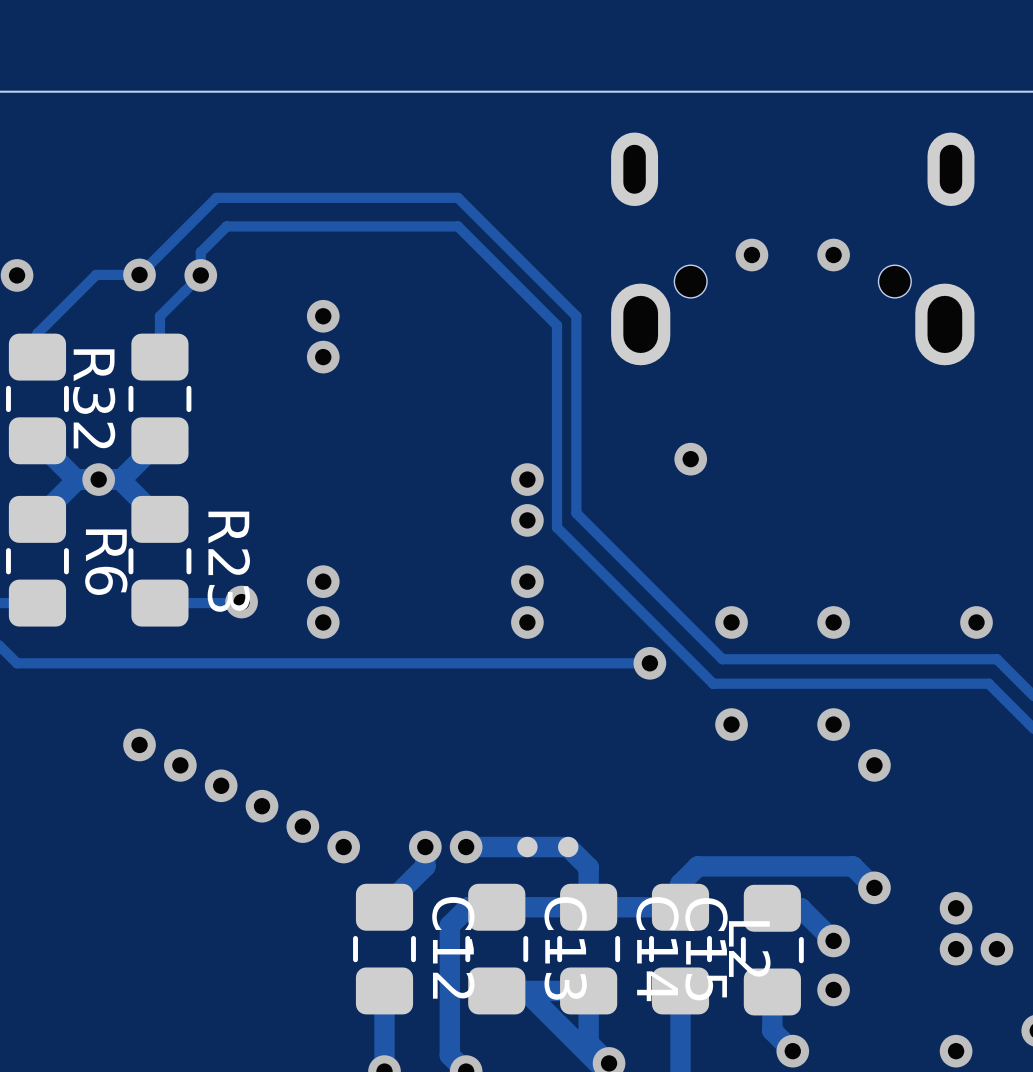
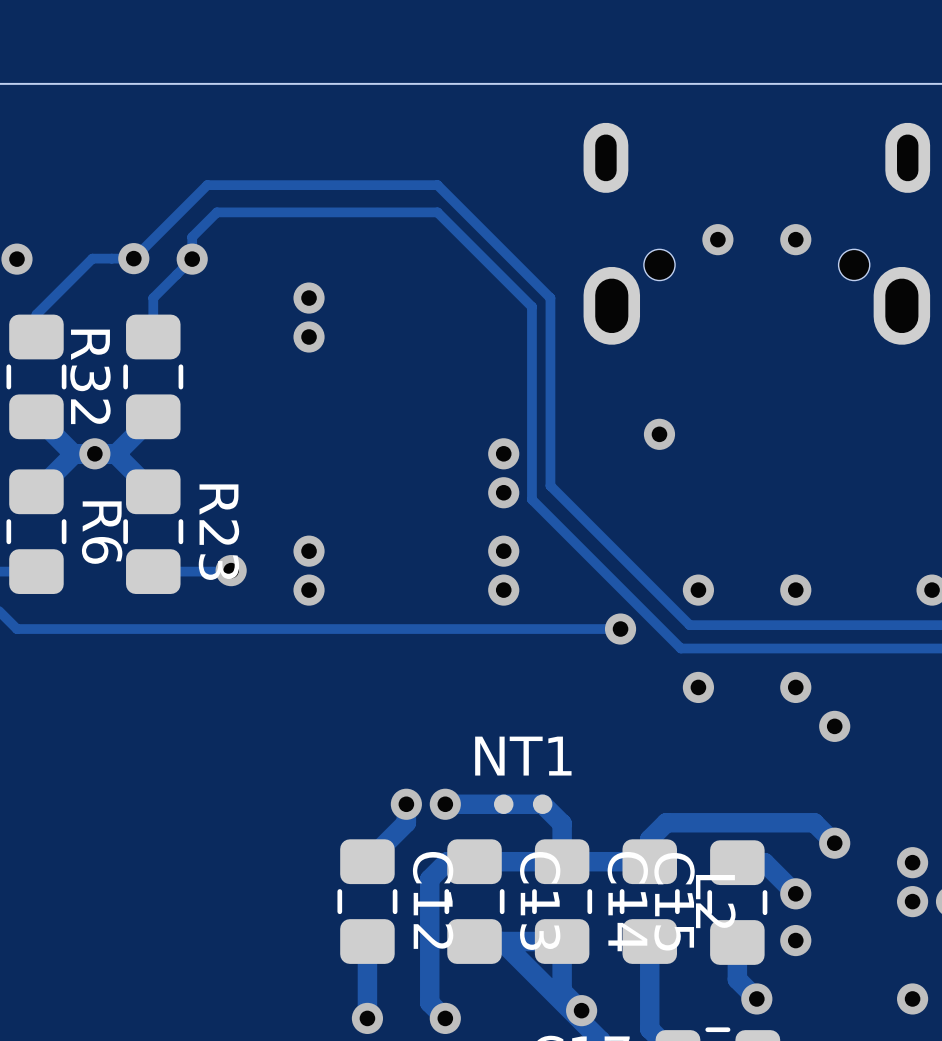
via: (139, 744) -> none
via: (180, 765) -> none
via: (221, 785) -> none
NT1 name: none -> NT1 (523, 756)
via: (262, 806) -> none
via: (302, 826) -> none
via: (343, 847) -> none

